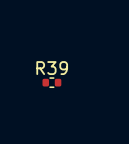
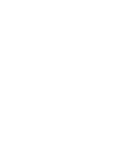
R39: (51, 82) -> none

